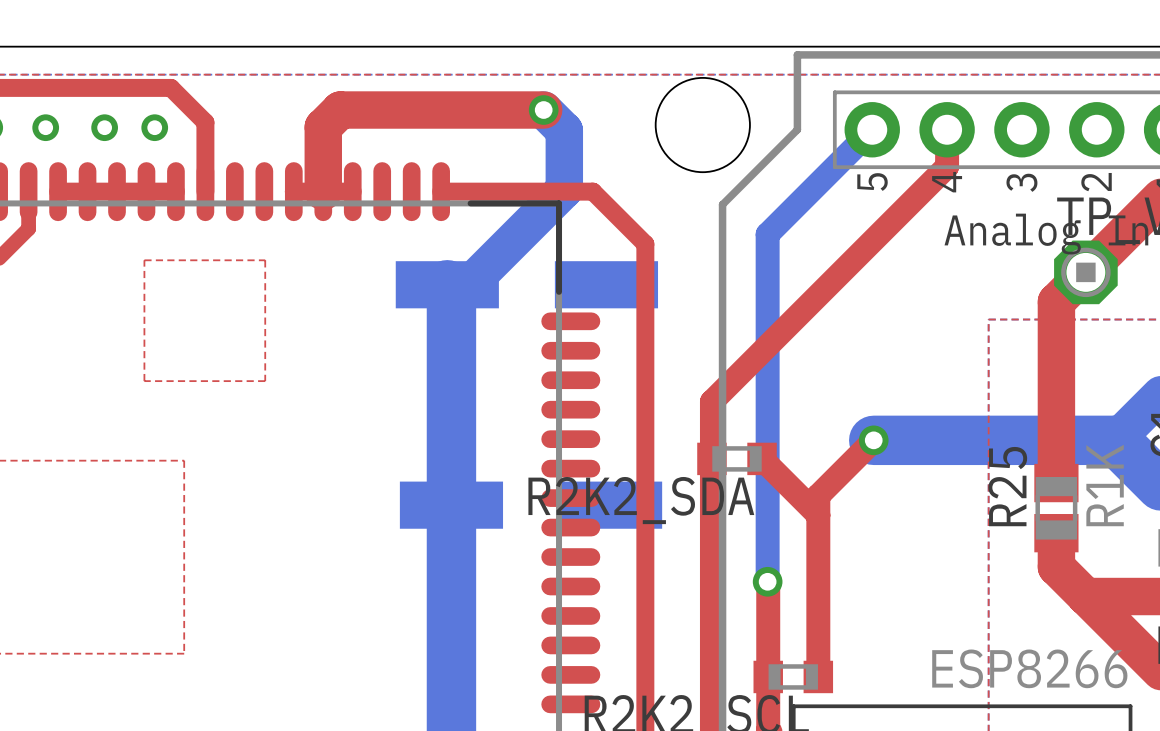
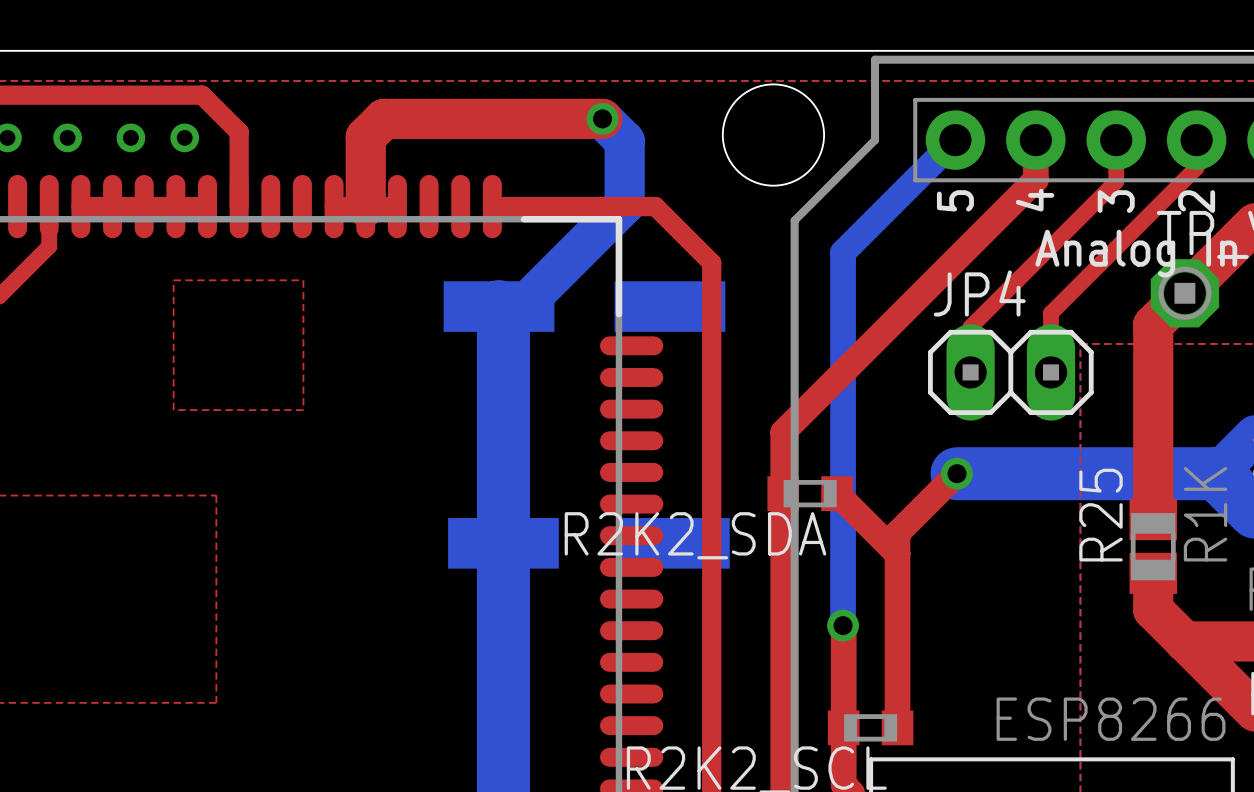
top track: none -> (1116, 140) (1116, 181) (970, 327) (970, 372)
top track: none -> (1196, 140) (1196, 167) (1051, 313) (1051, 372)
JP4: none -> (1010, 372)

